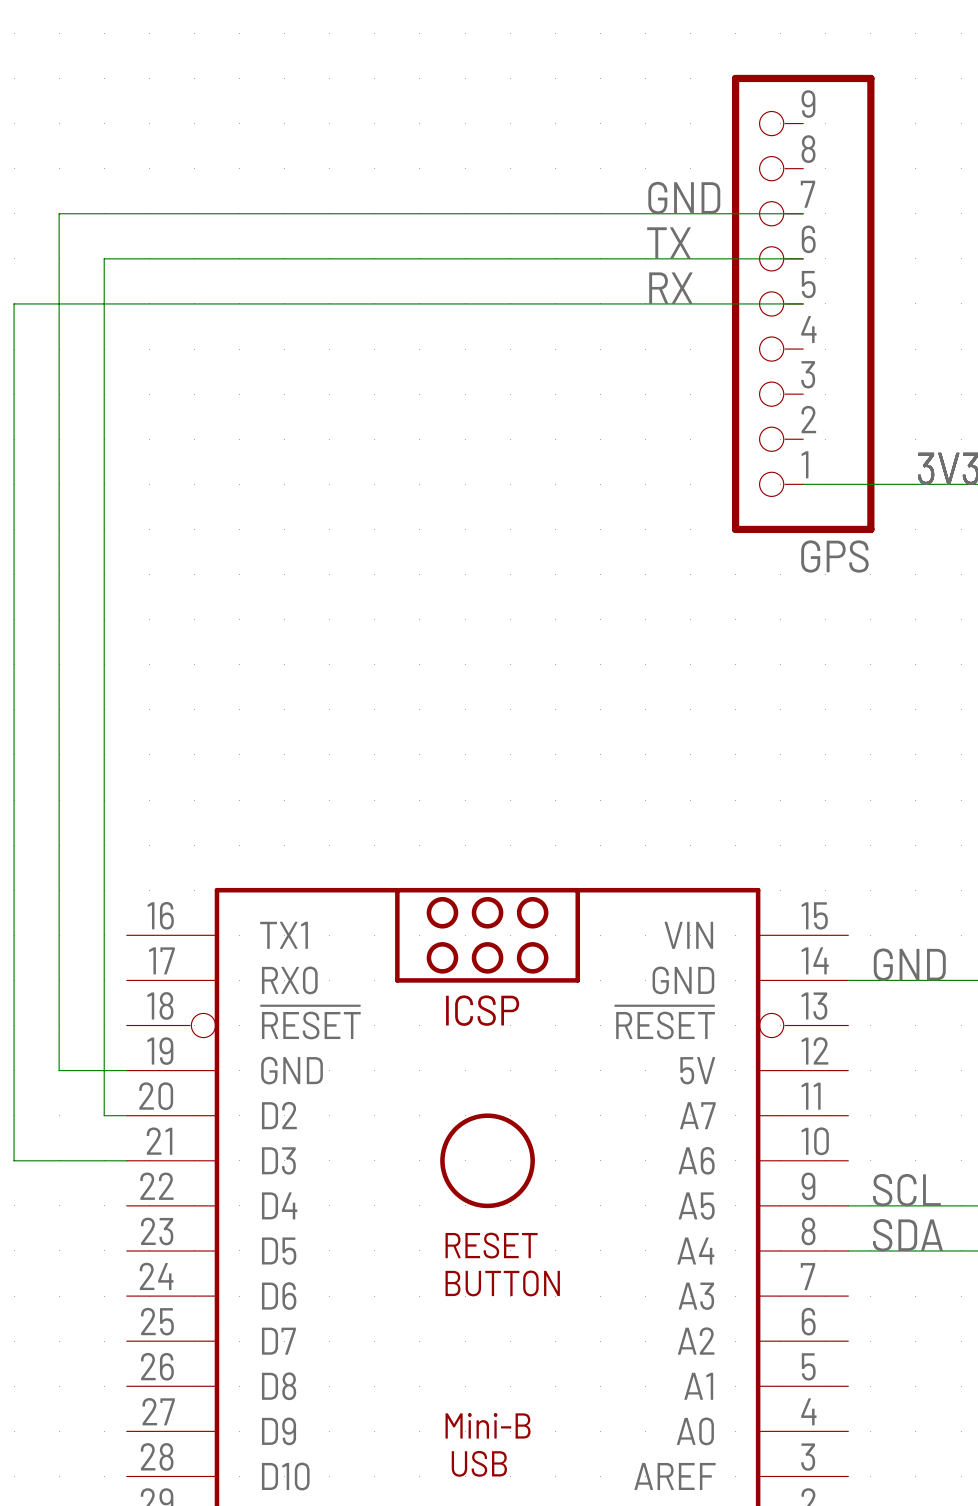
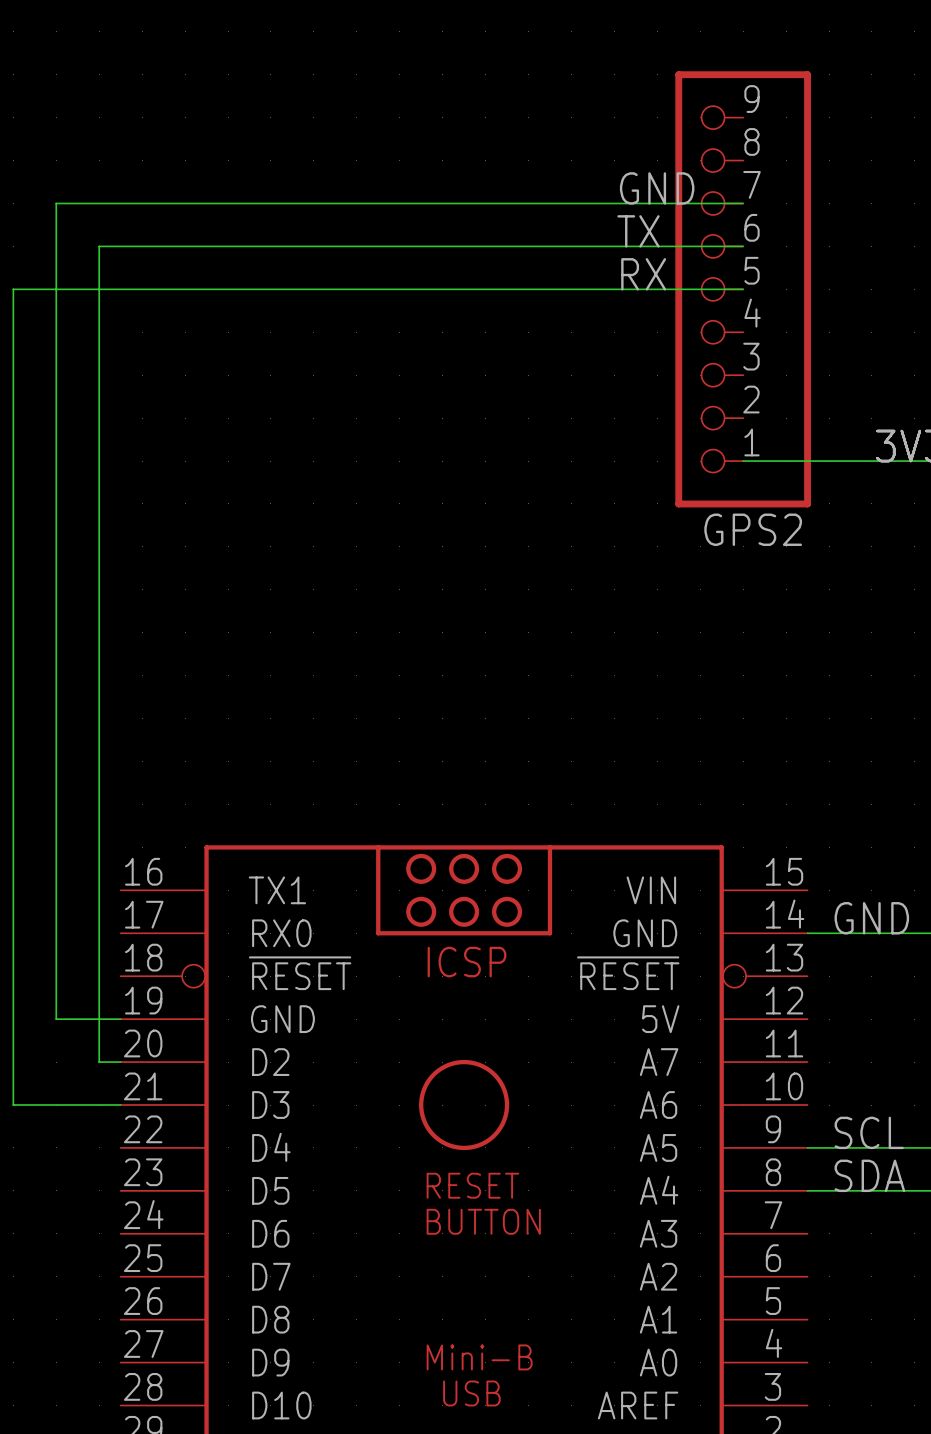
wire: (780, 213) (803, 213) -> none
wire: (780, 258) (803, 258) -> none
GPS2: none -> (743, 289)
GPS: (803, 303) -> none

